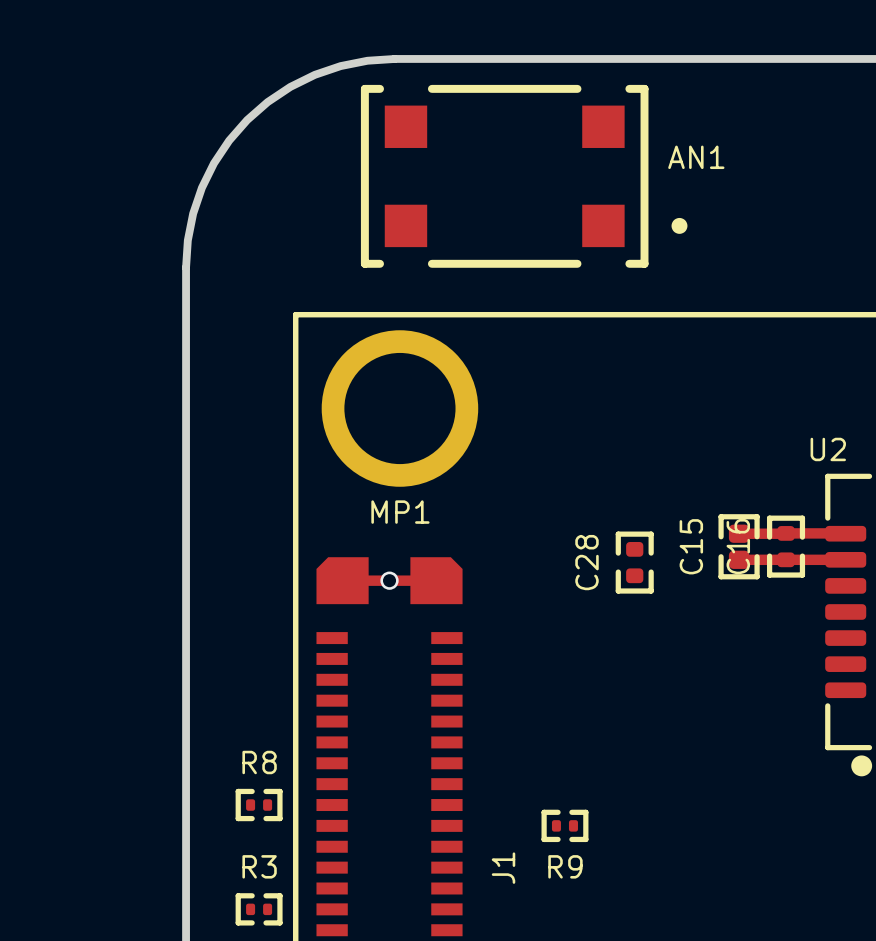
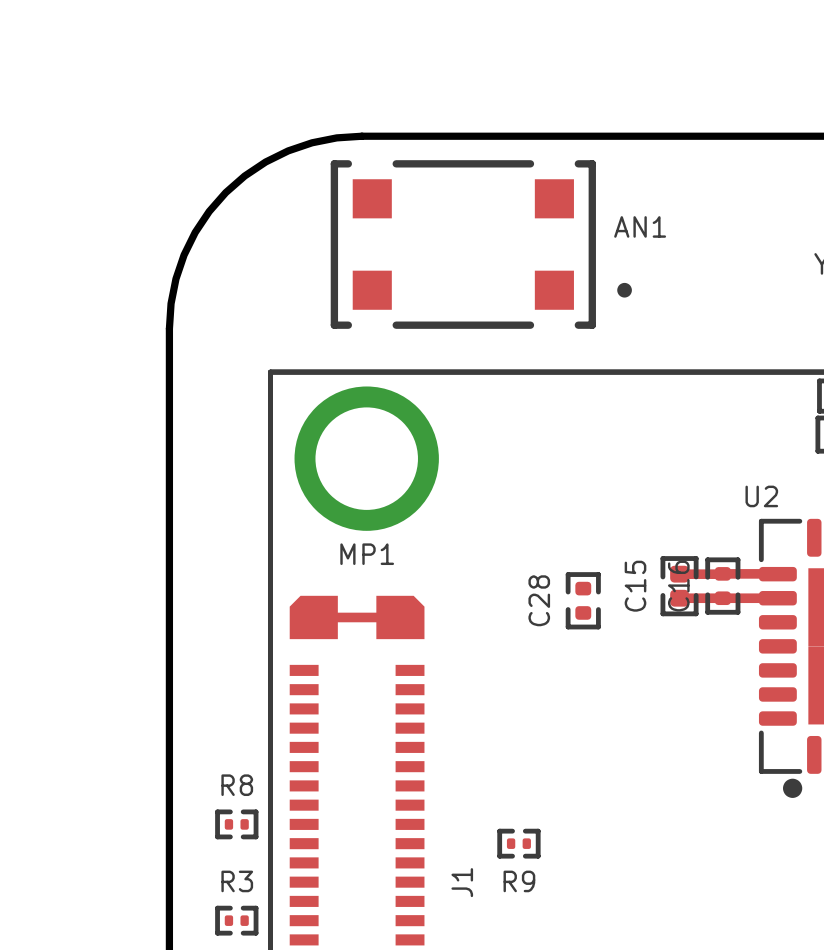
via: (389, 580) -> none

